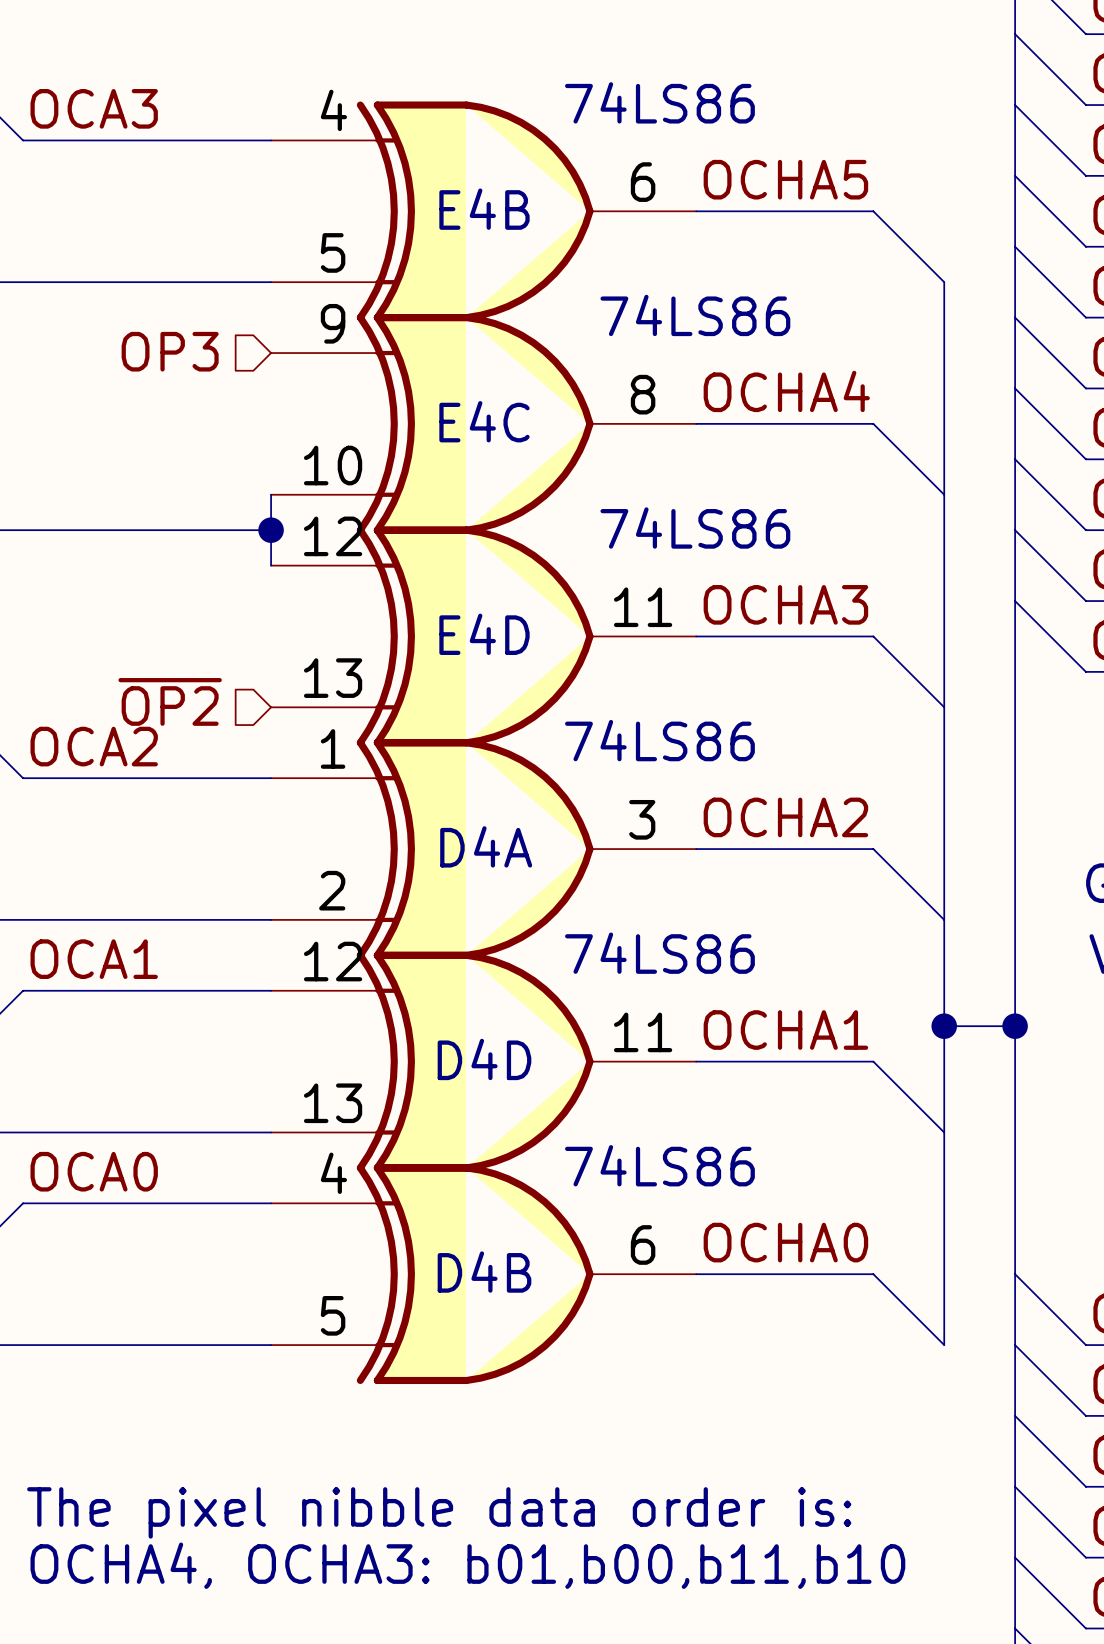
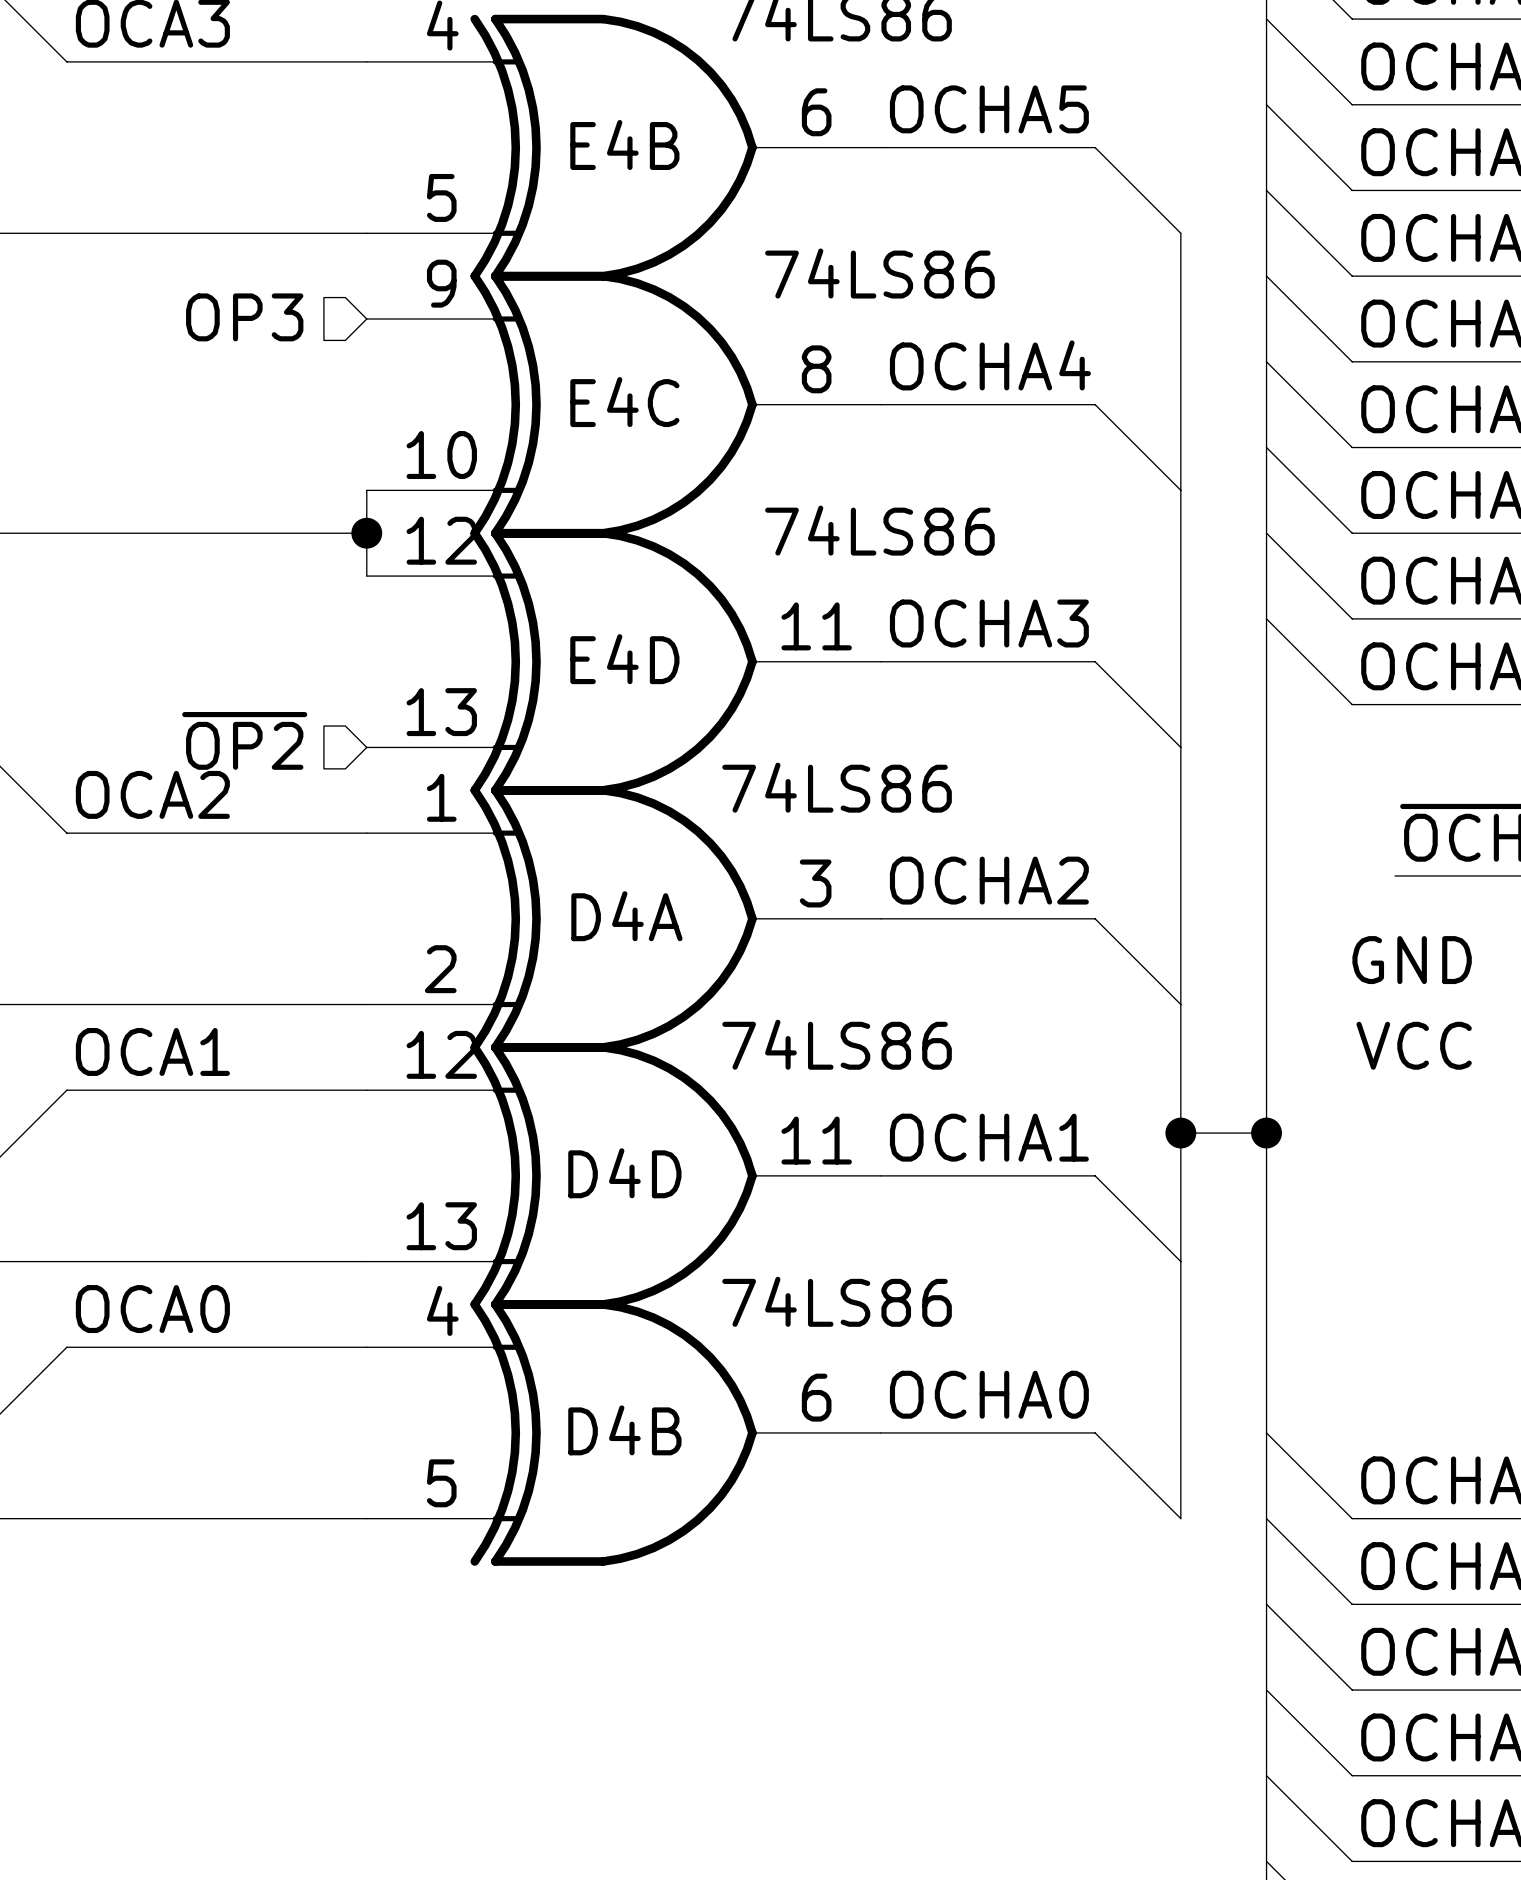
text: The pixel nibble data order is: (439, 1512) -> none
text: OCHA4, OCHA3: b01,b00,b11,b10 (467, 1565) -> none

